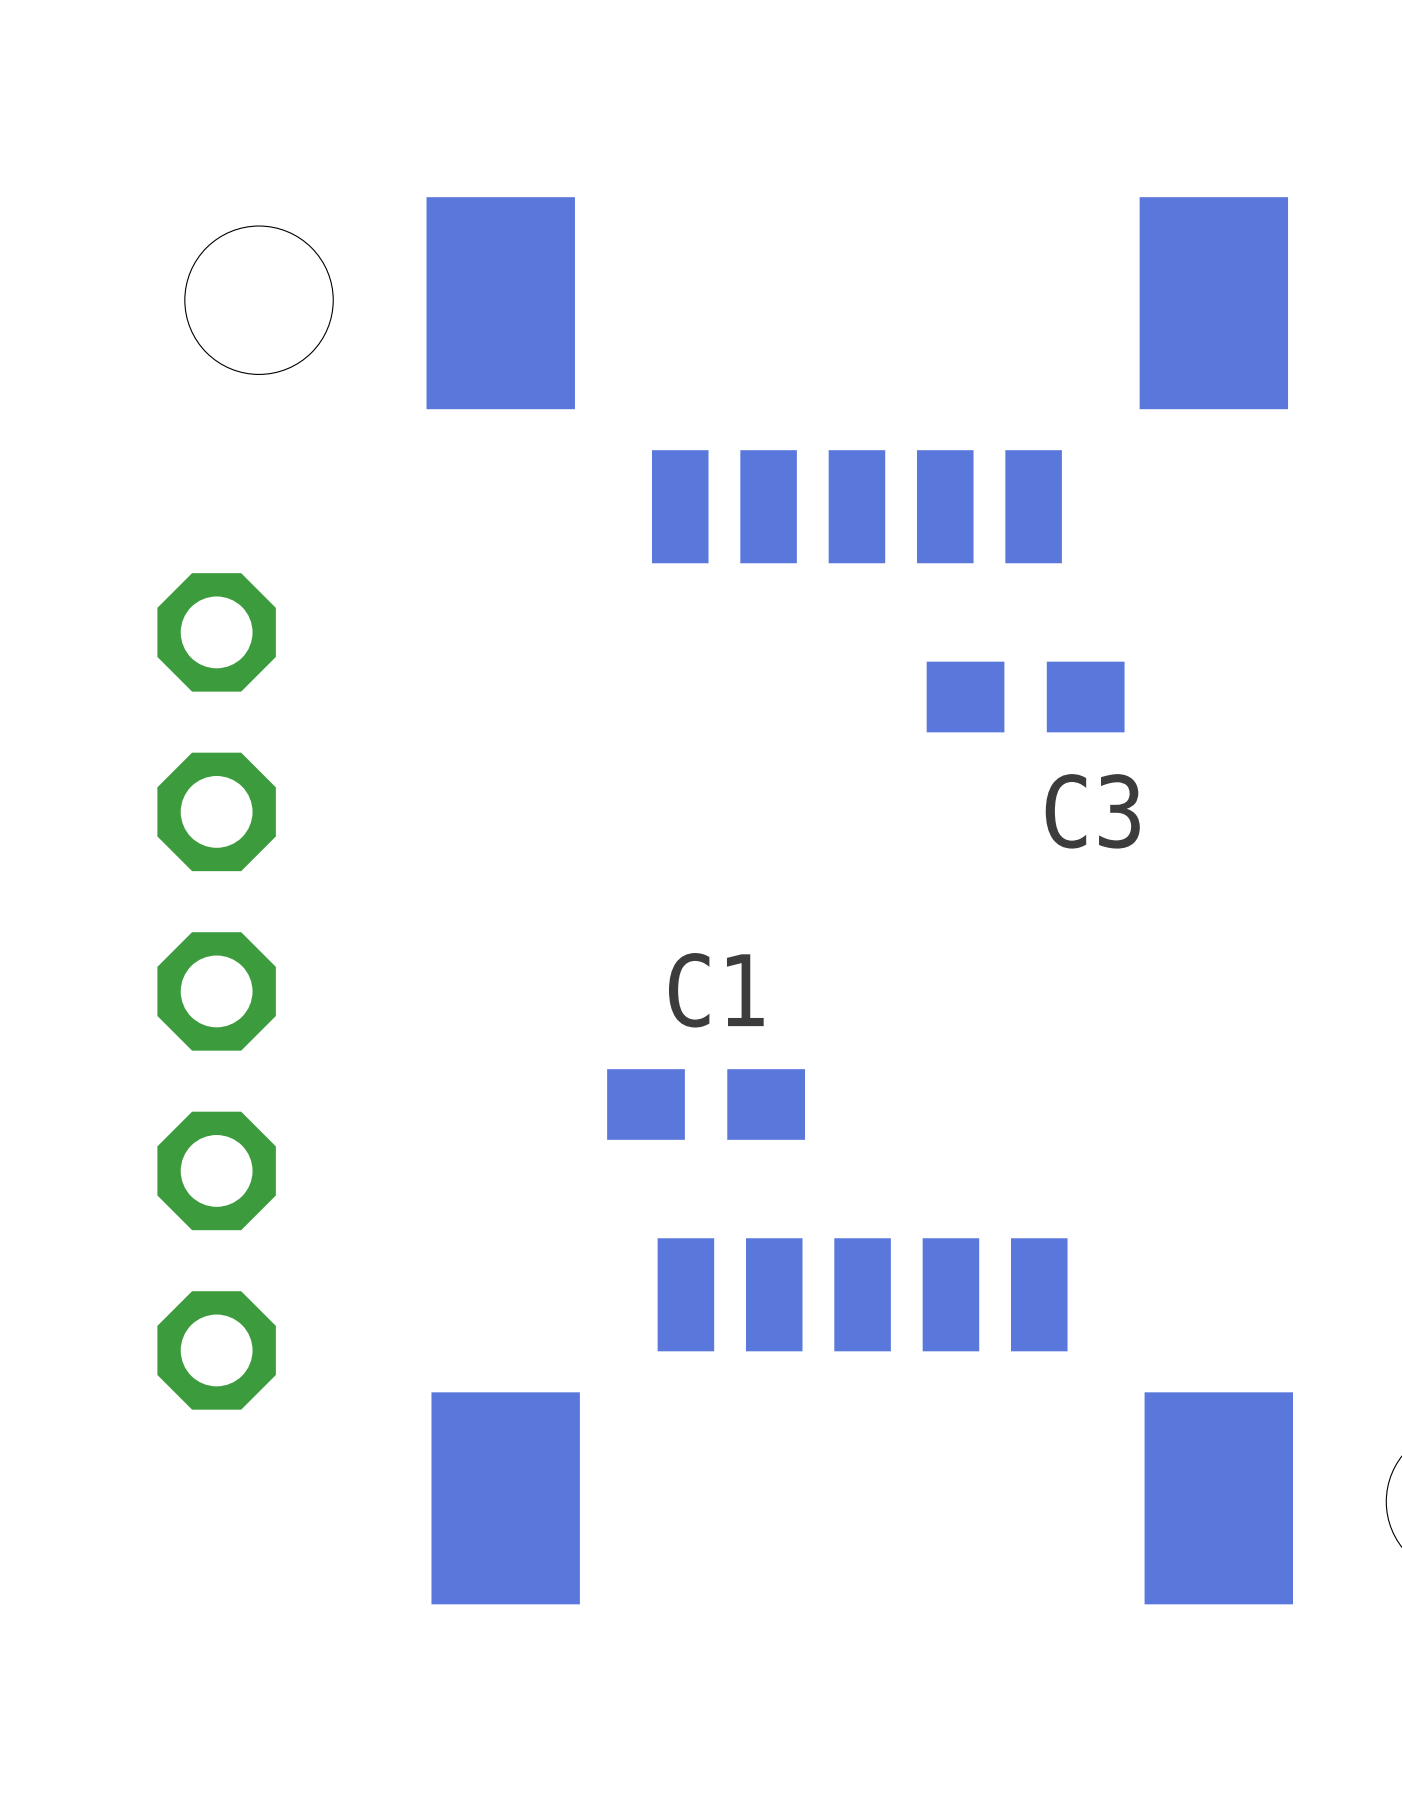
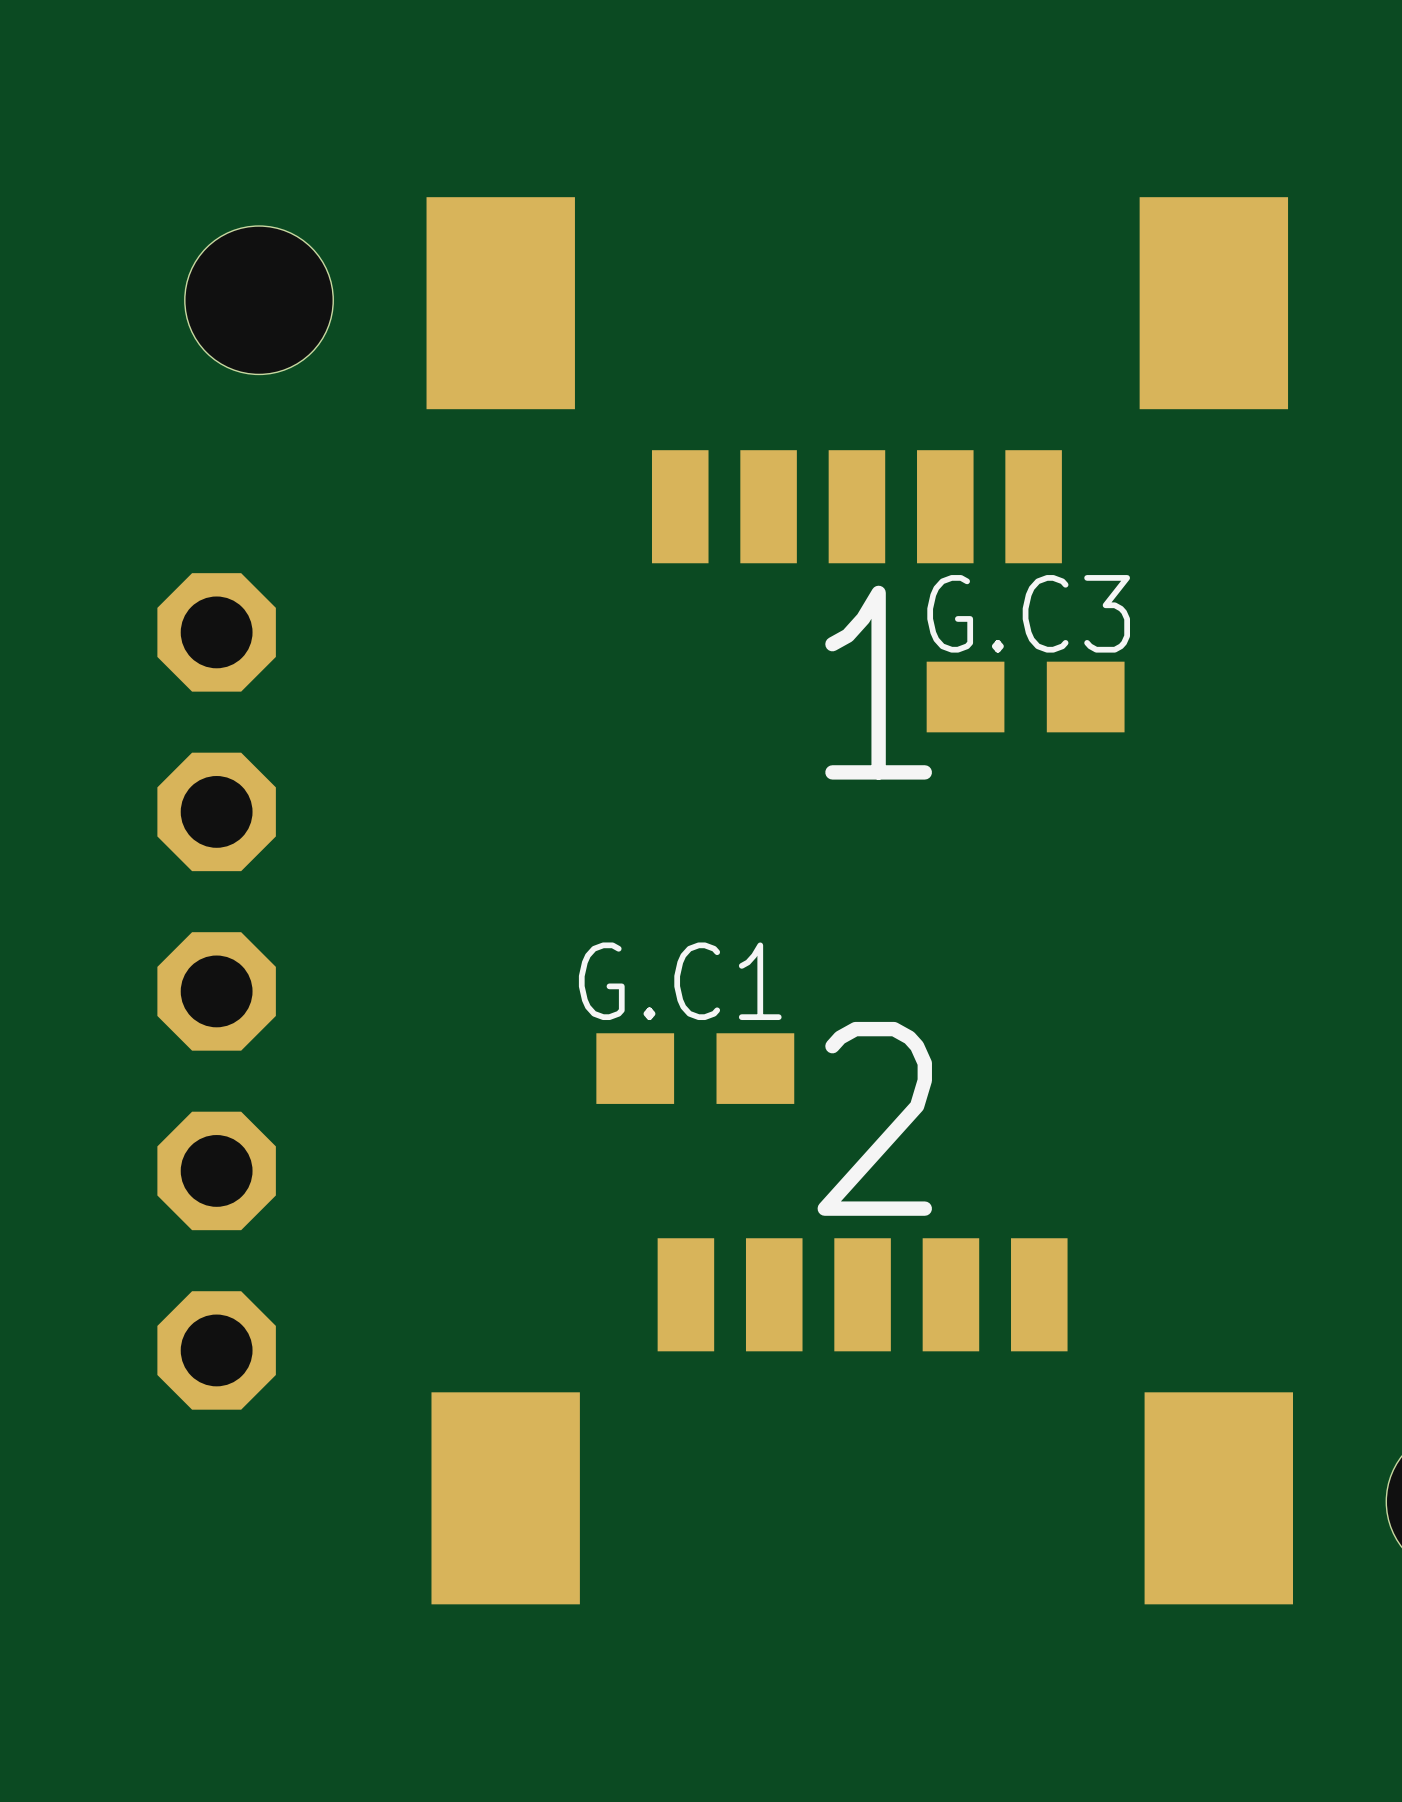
text: none -> 1 (878, 682)
C3 name: C3 (1092, 811) -> G.C3 (1028, 613)
C1 name: C1 (716, 990) -> G.C1 (680, 981)
C1 position: (706, 1104) -> (695, 1068)
text: none -> 2 (874, 1118)

